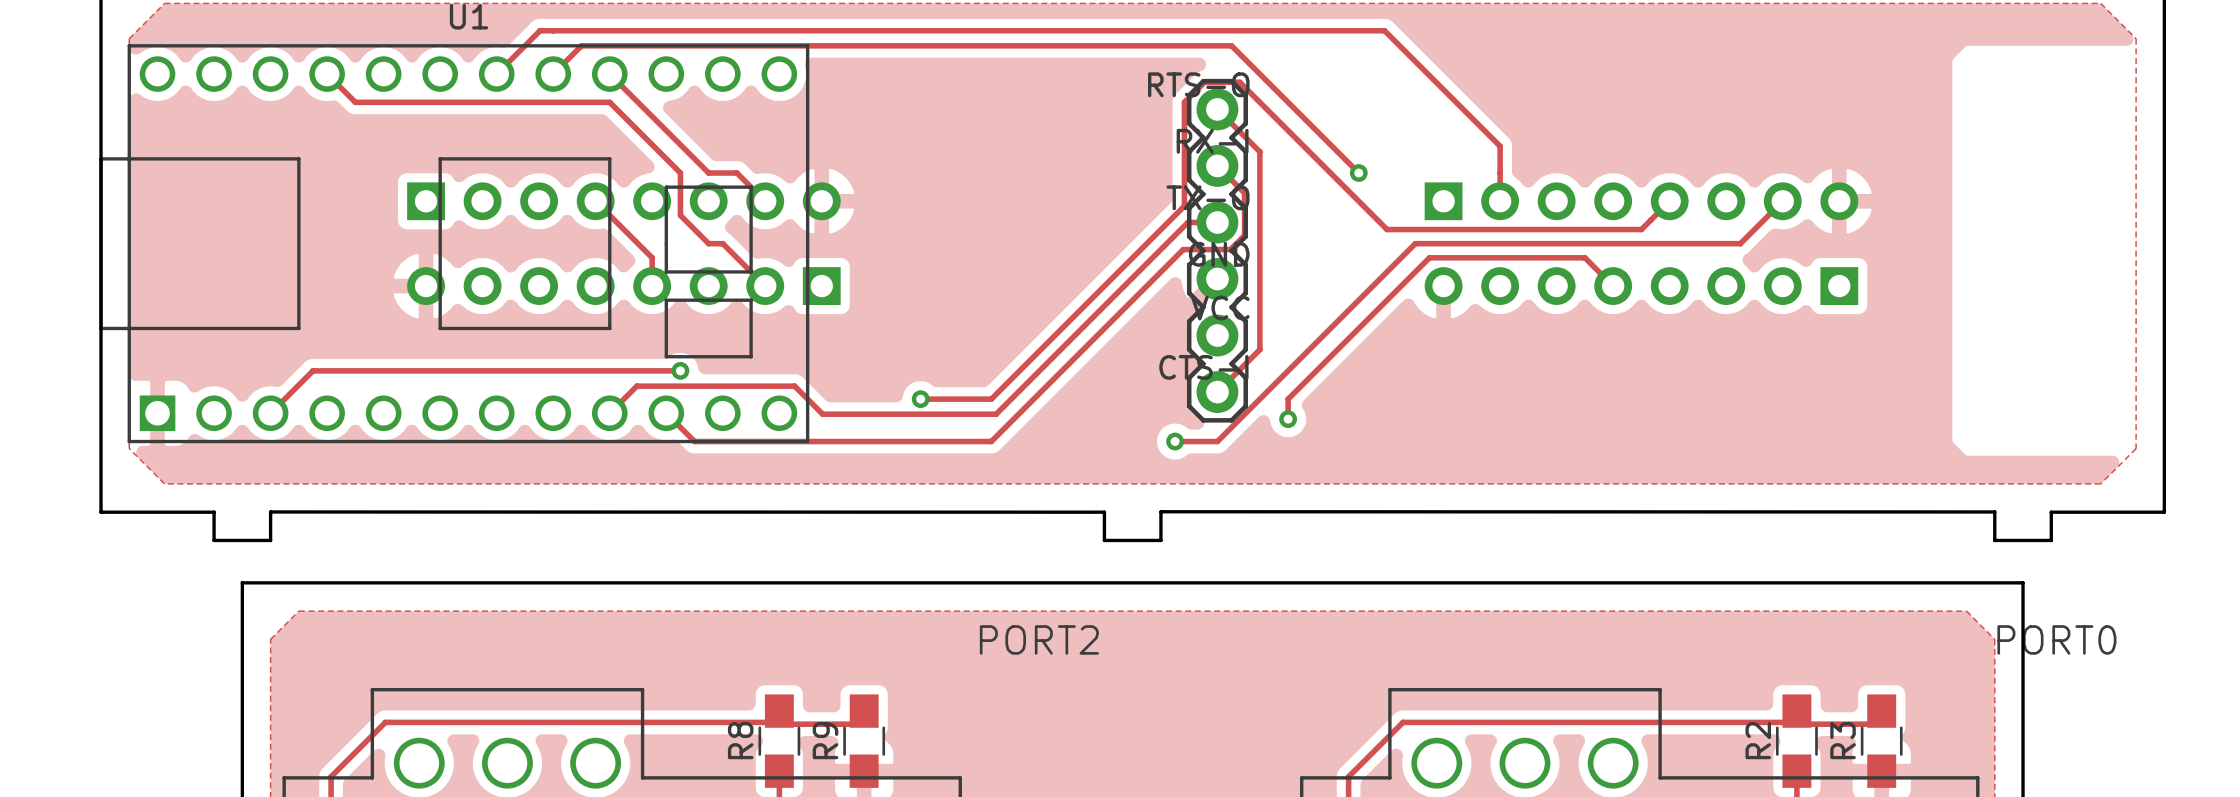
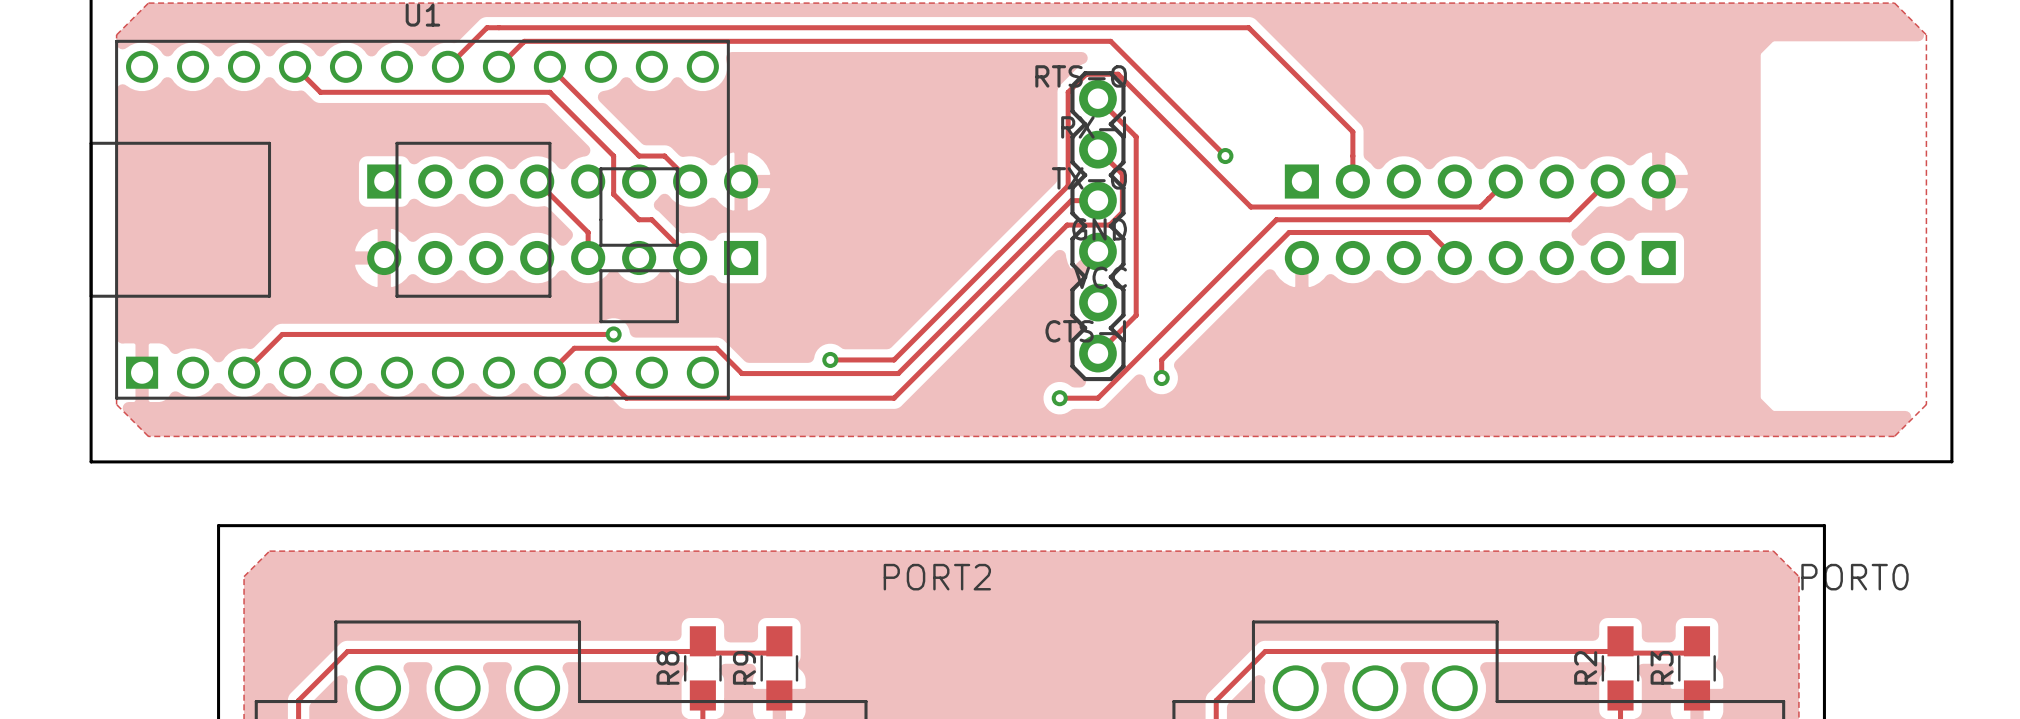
board edge: (1160, 511) (1994, 511) (1994, 540) (2051, 540) (2051, 512) (2164, 512) -> none
board edge: (101, 512) (214, 512) (214, 540) (270, 540) (270, 511) (1104, 512) (1104, 540) (1160, 540) (1160, 511) -> (91, 461) (1951, 461)

